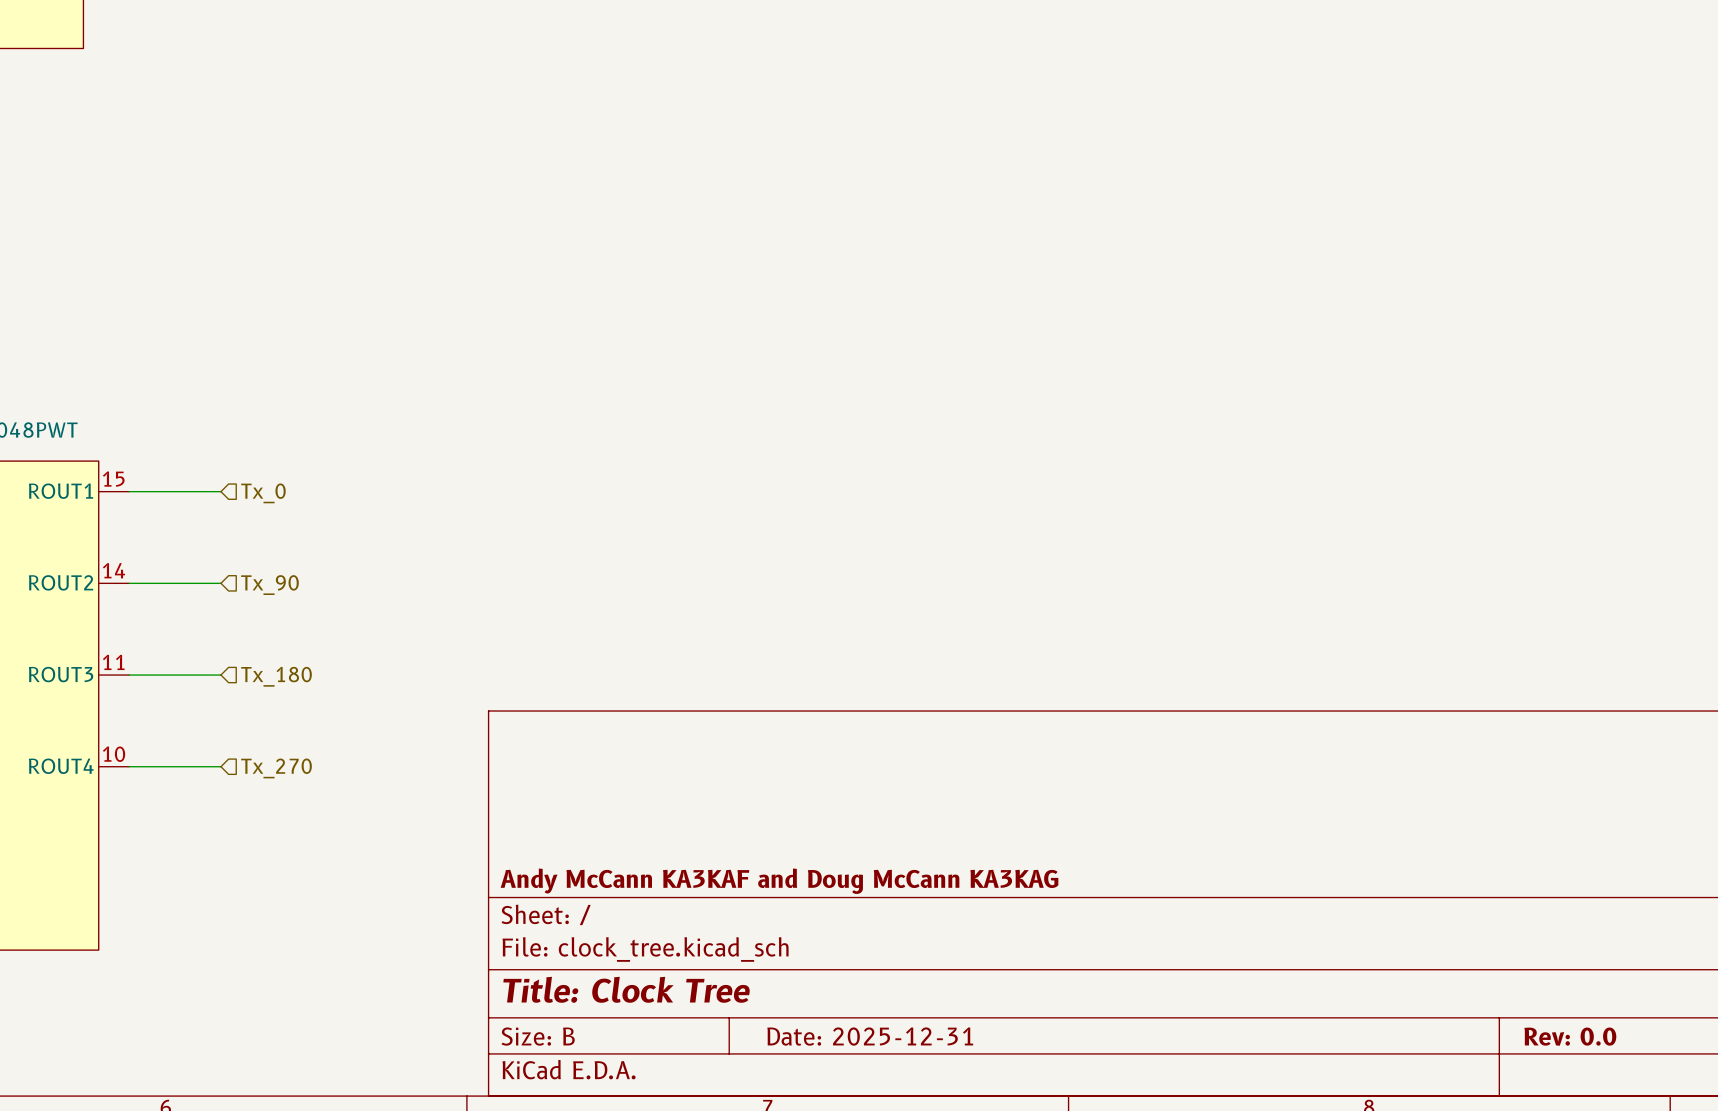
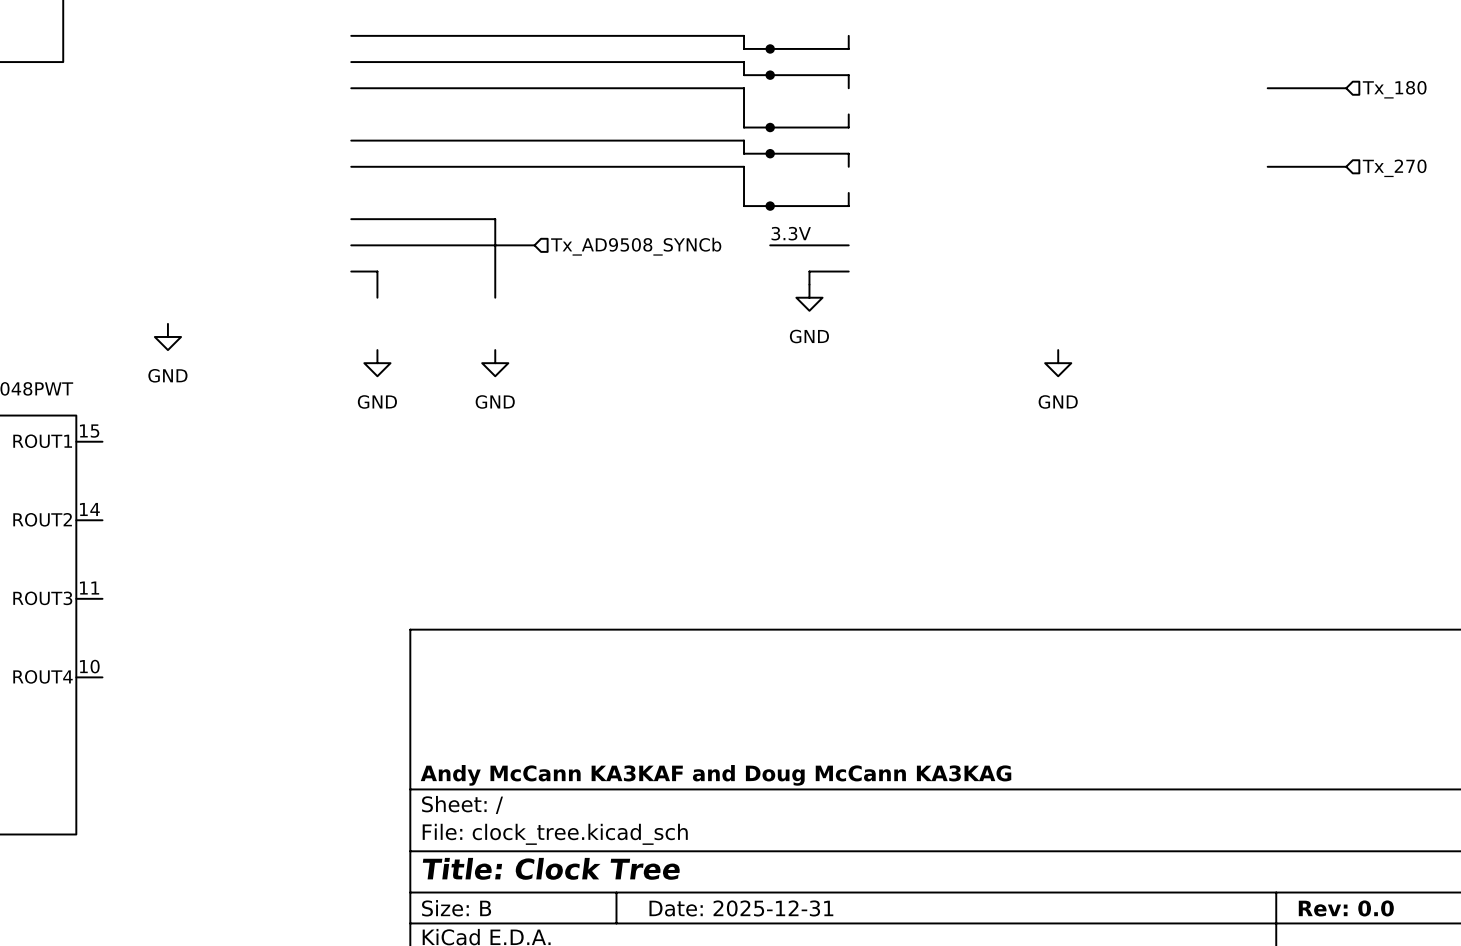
wire: none -> (351, 35) (744, 35) (744, 48) (848, 48) (848, 35)
junction: none -> (770, 48)
wire: none -> (351, 62) (744, 62) (744, 75) (848, 75) (848, 88)
junction: none -> (770, 75)
wire: none -> (351, 88) (744, 88) (744, 127) (848, 127) (848, 114)
wire: none -> (1267, 88) (1346, 88)
hierarchical label: none -> Tx_180 (1394, 89)
junction: none -> (770, 127)
wire: none -> (351, 140) (744, 140) (744, 153) (848, 153) (848, 166)
junction: none -> (770, 153)
wire: none -> (351, 166) (744, 166) (744, 206) (848, 206) (848, 192)
wire: none -> (1267, 166) (1346, 166)
hierarchical label: none -> Tx_270 (1394, 168)
junction: none -> (770, 206)
wire: none -> (351, 219) (495, 219) (495, 297)
label: none -> 3.3V (791, 233)
wire: none -> (351, 245) (534, 245)
wire: none -> (770, 245) (848, 245)
hierarchical label: none -> Tx_AD9508_SYNCb (636, 246)
wire: none -> (351, 271) (377, 271) (377, 297)
wire: none -> (848, 271) (809, 271) (809, 284)
power symbol: none -> GND (809, 297)
power symbol: none -> GND (167, 336)
power symbol: none -> GND (377, 363)
power symbol: none -> GND (495, 363)
power symbol: none -> GND (1058, 363)
wire: (129, 491) (220, 491) -> none
hierarchical label: Tx_0 (263, 493) -> none
wire: (129, 583) (220, 583) -> none
hierarchical label: Tx_90 (269, 585) -> none
wire: (129, 675) (220, 675) -> none
hierarchical label: Tx_180 (276, 676) -> none
wire: (129, 766) (220, 766) -> none
hierarchical label: Tx_270 (276, 768) -> none

